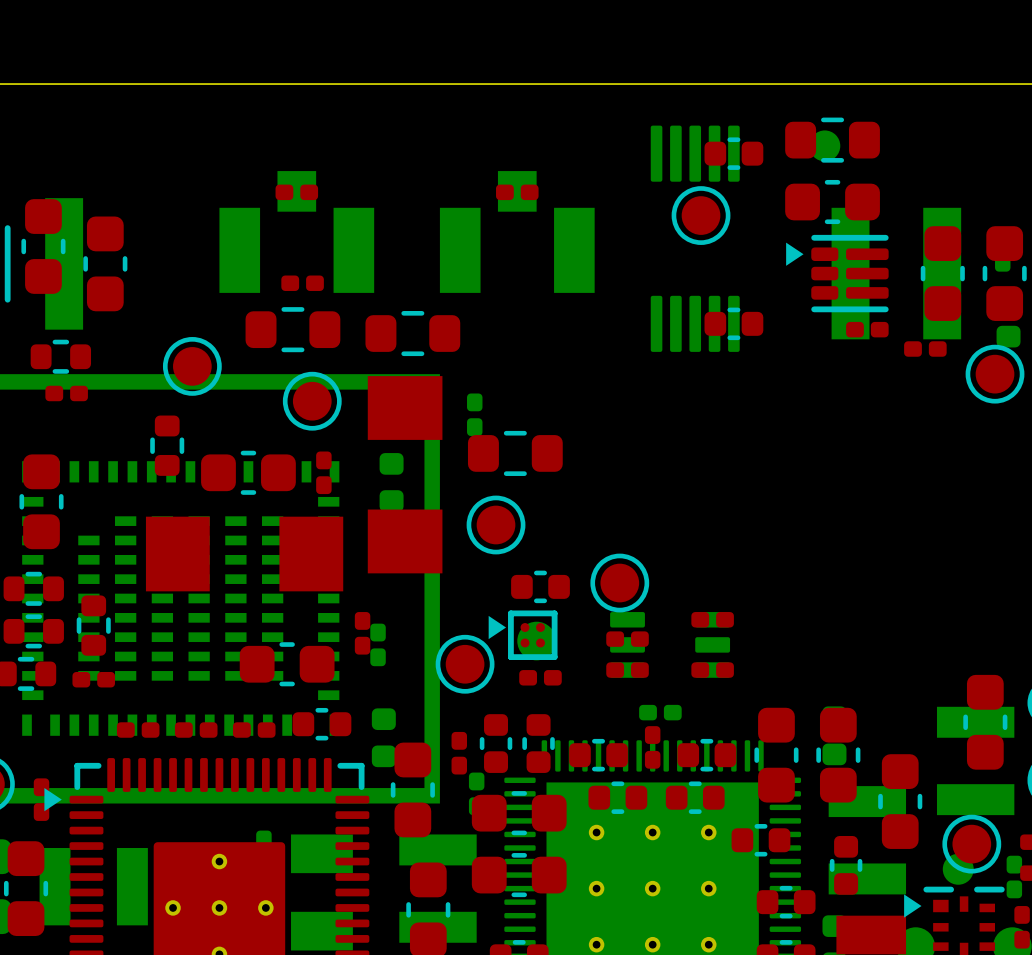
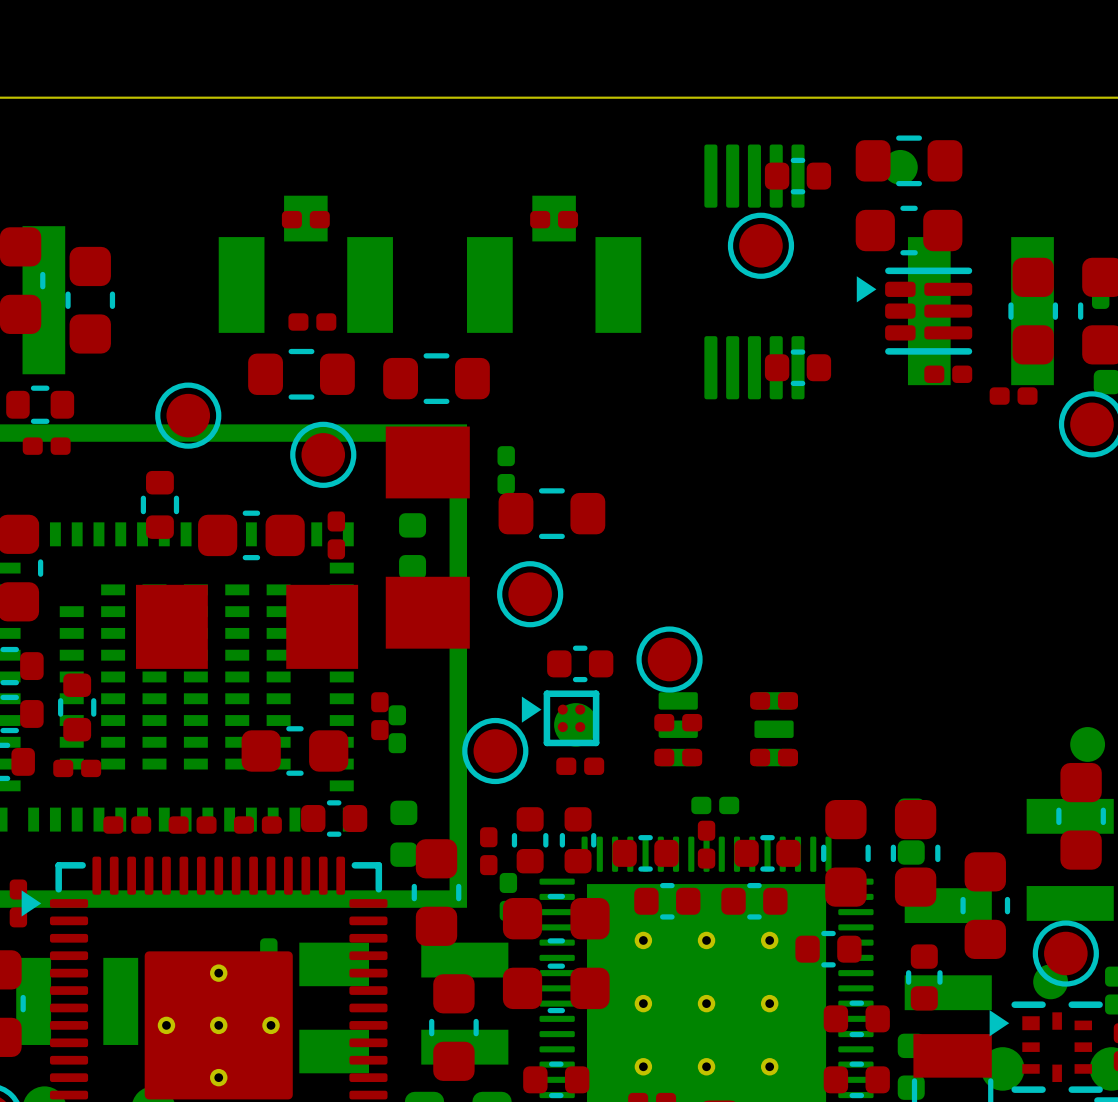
part: none -> (1087, 744)

